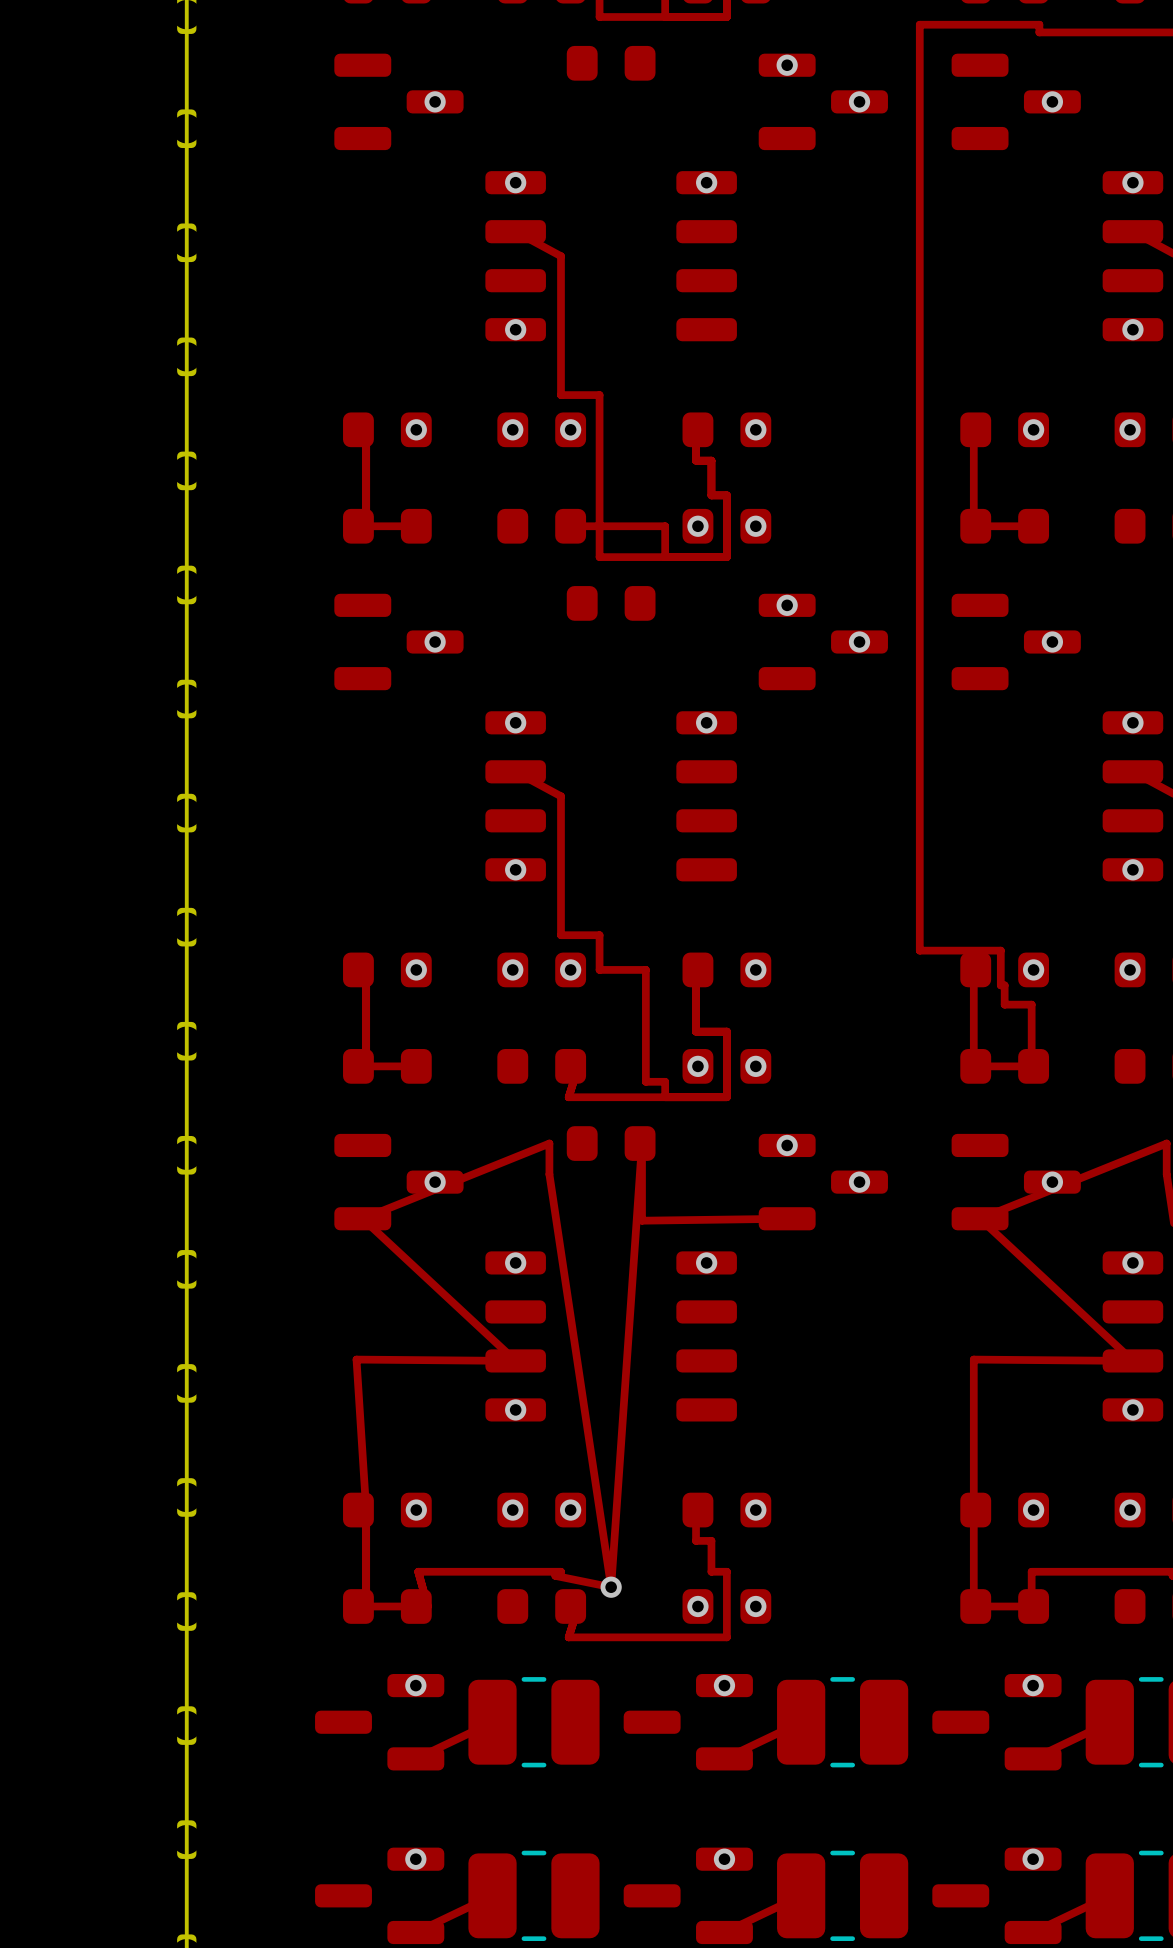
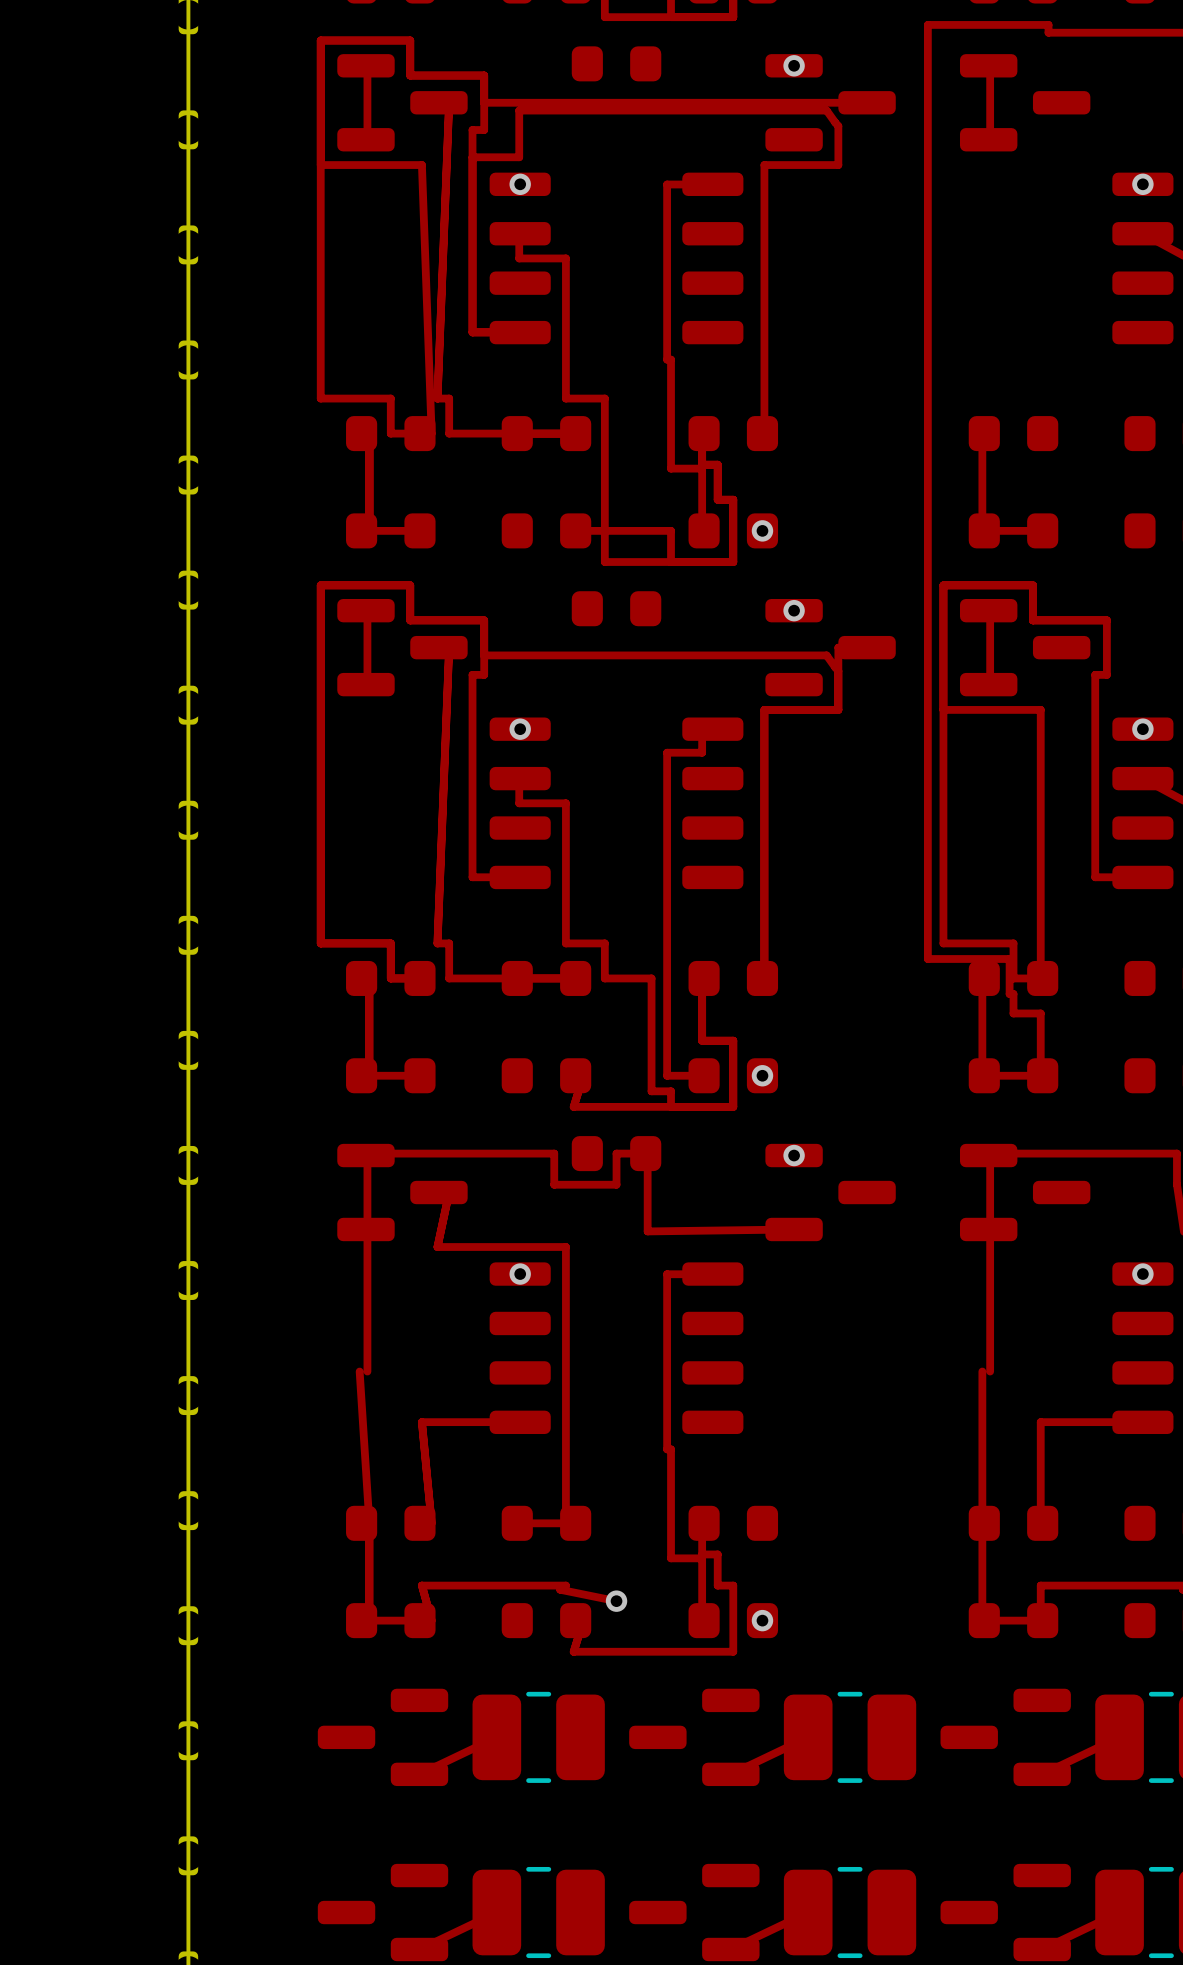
track: none -> (367, 63) (367, 137)
track: none -> (990, 63) (990, 137)
via: (435, 101) -> none
track: none -> (449, 102) (437, 398) (449, 398) (449, 433) (573, 433)
track: none -> (484, 102) (865, 102)
via: (859, 101) -> none
via: (1052, 101) -> none
track: none -> (472, 157) (519, 157) (519, 110) (826, 110) (838, 126) (838, 165) (764, 165) (764, 433)
track: none -> (320, 165) (421, 165) (431, 433) (390, 433) (390, 398) (320, 398) (320, 40) (410, 40) (410, 75) (484, 75) (484, 130) (472, 130) (472, 332) (519, 332)
via: (706, 182) -> none
track: none -> (713, 184) (667, 184) (667, 359) (671, 359) (671, 468) (702, 468) (702, 530)
track: (515, 231) (560, 256) -> (519, 235) (519, 258) (565, 258)
via: (515, 329) -> none
via: (1132, 329) -> none
via: (416, 429) -> none
via: (512, 429) -> none
via: (570, 429) -> none
via: (755, 429) -> none
via: (1033, 429) -> none
via: (1130, 429) -> none
via: (697, 526) -> none
track: none -> (367, 608) (367, 686)
track: none -> (990, 608) (990, 686)
via: (435, 641) -> none
track: none -> (449, 647) (437, 943) (449, 943) (449, 978) (573, 978)
track: none -> (865, 647) (838, 647) (838, 709) (764, 709) (764, 978)
via: (859, 641) -> none
via: (1052, 641) -> none
track: none -> (484, 655) (826, 655) (838, 670)
track: none -> (943, 709) (1040, 709) (1040, 978) (1013, 978) (1013, 943) (943, 943) (943, 585) (1032, 585) (1032, 620) (1106, 620) (1106, 674) (1095, 674) (1095, 877) (1141, 877)
via: (706, 722) -> none
track: none -> (713, 729) (702, 729) (702, 752) (667, 752) (667, 1075) (702, 1075)
track: (515, 771) (560, 796) -> (519, 779) (519, 803) (565, 803)
track: none -> (519, 877) (472, 877) (472, 674) (484, 674) (484, 620) (410, 620) (410, 585) (320, 585) (320, 943) (390, 943) (390, 978) (421, 978)
via: (515, 869) -> none
via: (1132, 869) -> none
via: (416, 969) -> none
via: (512, 969) -> none
via: (570, 969) -> none
via: (755, 969) -> none
via: (1033, 969) -> none
via: (1130, 969) -> none
via: (697, 1066) -> none
track: (549, 1143) (362, 1218) (515, 1360) (356, 1359) -> (554, 1153) (367, 1153) (367, 1371)
track: (642, 1143) (611, 1587) (549, 1174) -> (647, 1153) (616, 1153) (616, 1184) (554, 1184)
track: (1166, 1143) (980, 1218) (1132, 1360) (973, 1359) -> (1176, 1153) (990, 1153) (990, 1371)
via: (435, 1182) -> none
track: none -> (449, 1192) (437, 1247) (565, 1247) (565, 1523)
via: (859, 1182) -> none
via: (1052, 1182) -> none
via: (706, 1262) -> none
track: none -> (713, 1274) (667, 1274) (667, 1449) (671, 1449) (671, 1558) (702, 1558) (702, 1620)
track: none -> (519, 1422) (421, 1422) (431, 1523)
via: (515, 1409) -> none
track: none -> (1141, 1422) (1040, 1422) (1040, 1523)
via: (1132, 1409) -> none
via: (416, 1510) -> none
track: none -> (515, 1523) (573, 1523)
via: (512, 1510) -> none
via: (570, 1510) -> none
via: (755, 1510) -> none
via: (1033, 1510) -> none
via: (1130, 1510) -> none
via: (697, 1606) -> none
via: (415, 1685) -> none
via: (724, 1685) -> none
via: (1033, 1685) -> none
via: (415, 1859) -> none
via: (724, 1859) -> none
via: (1033, 1859) -> none

